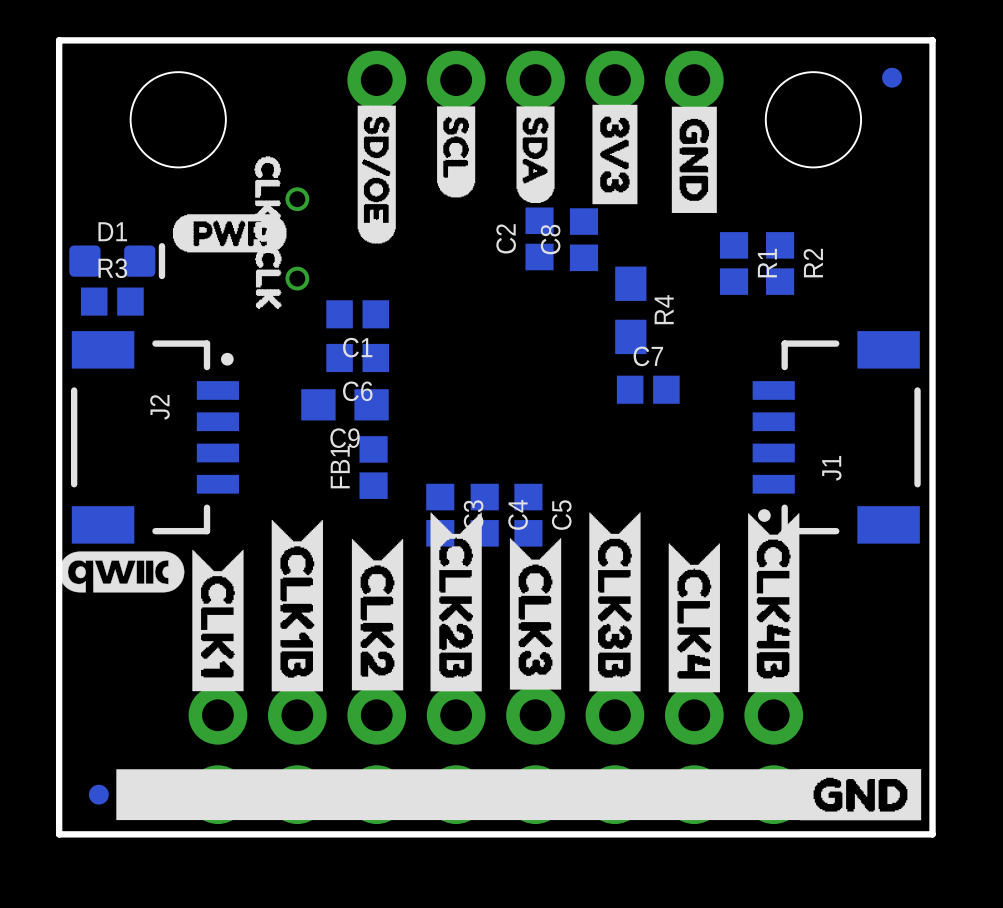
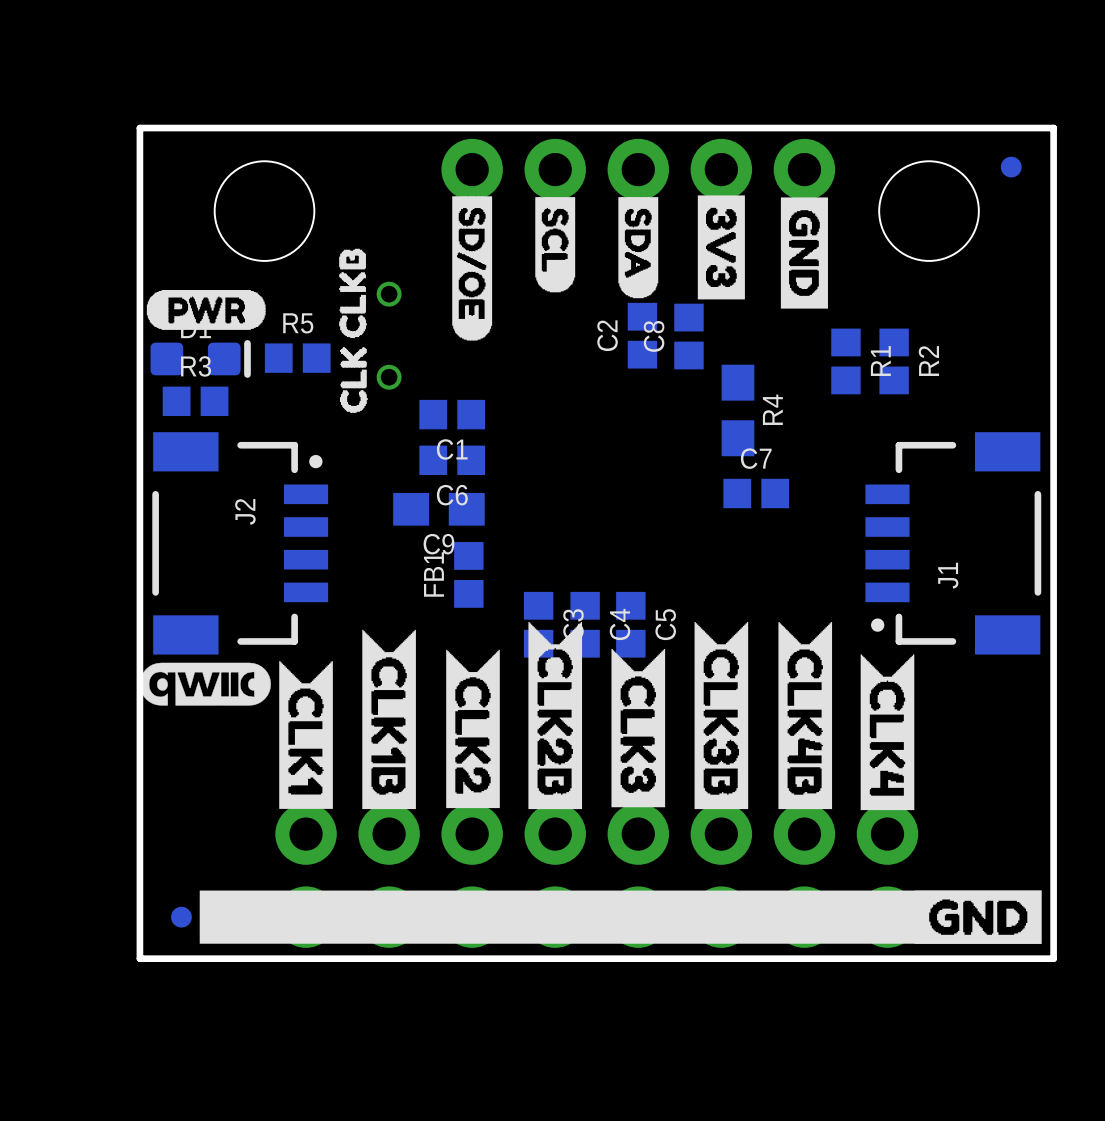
drawing shape: [254, 156, 281, 242] -> [339, 248, 367, 339]
drawing position: (229, 233) -> (206, 309)
drawing shape: [255, 246, 282, 309] -> [339, 347, 368, 413]
R5: none -> (297, 358)
drawing position: (773, 602) -> (805, 715)
drawing position: (694, 617) -> (887, 732)

